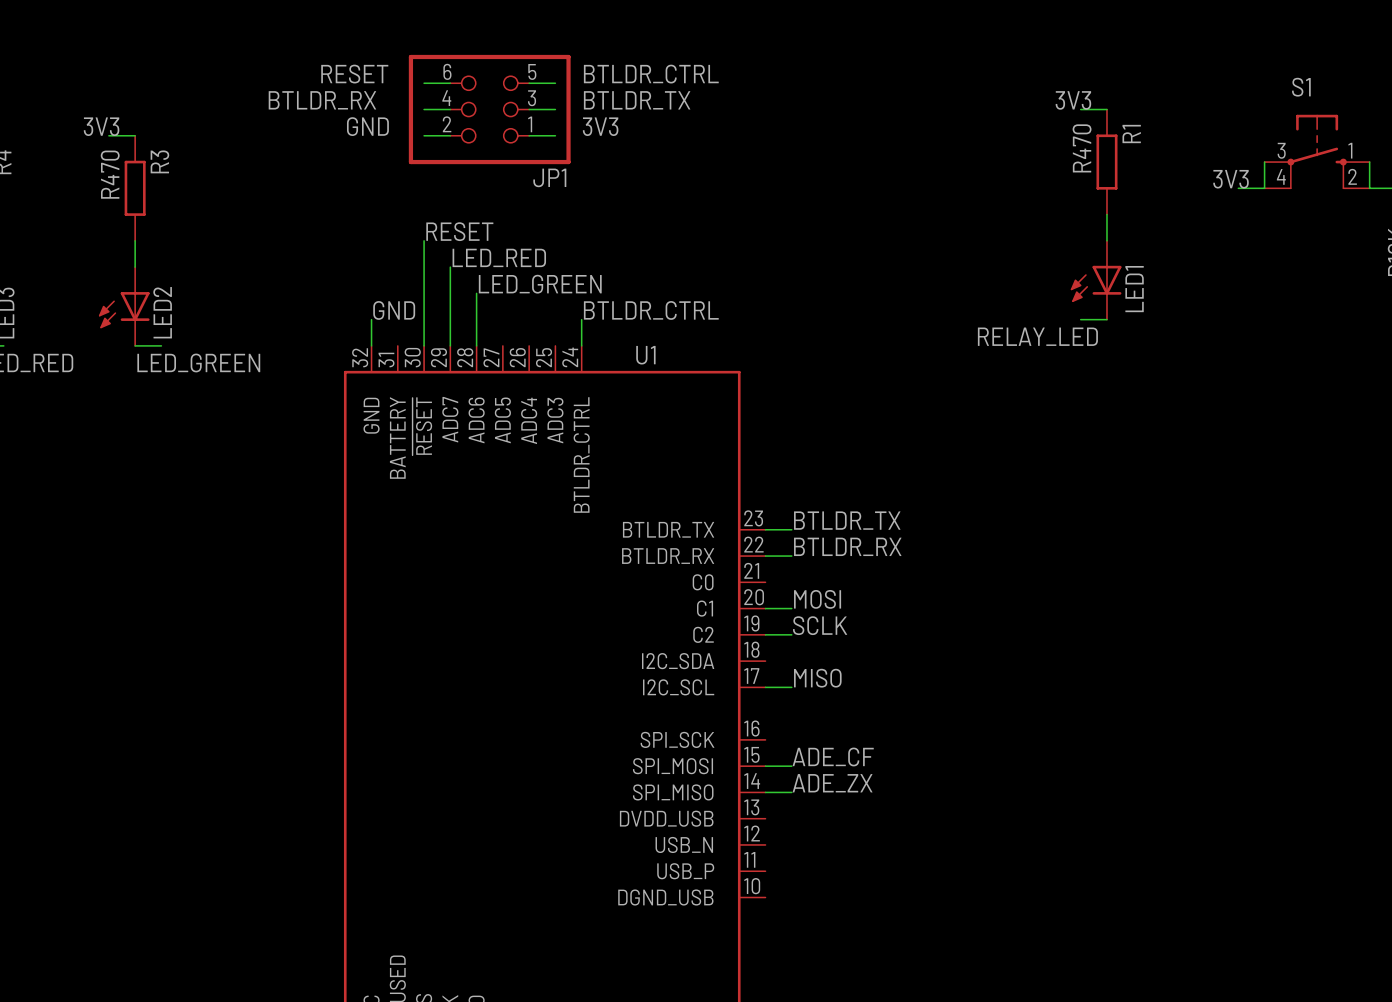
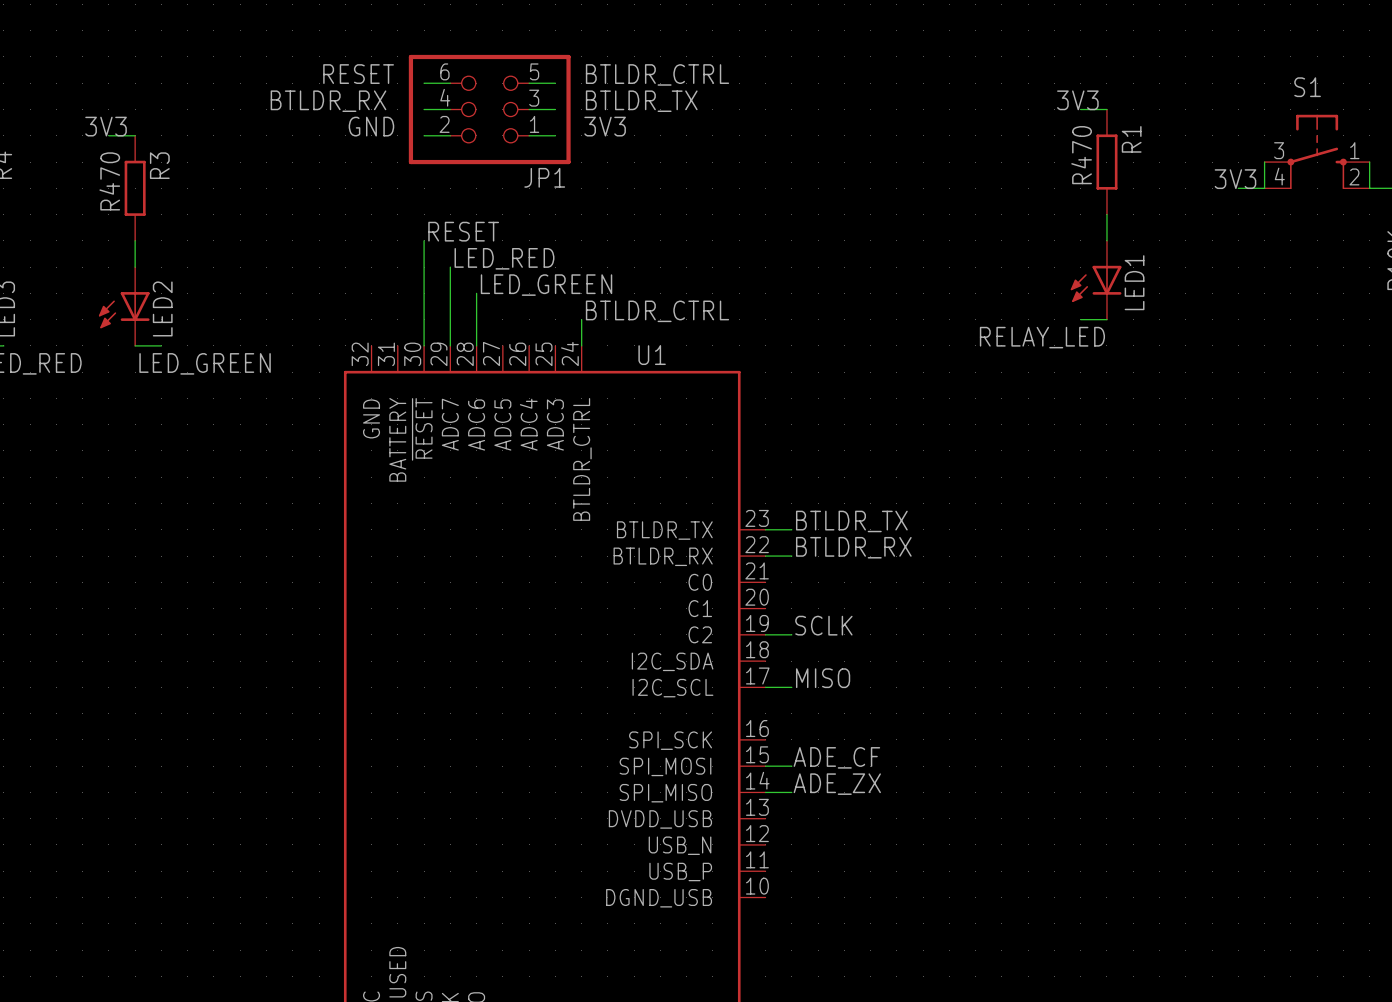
label: GND (394, 310) -> none
wire: (371, 319) (371, 345) -> none
label: MOSI (817, 599) -> none
wire: (765, 608) (791, 608) -> none

